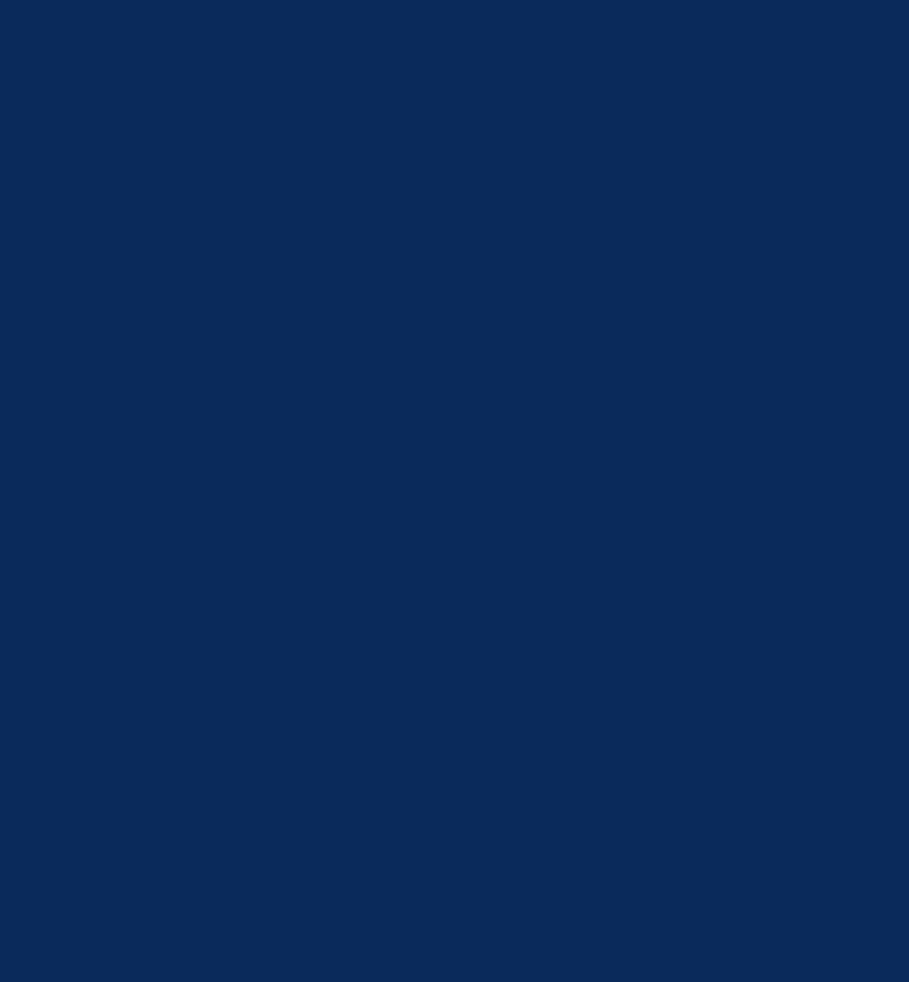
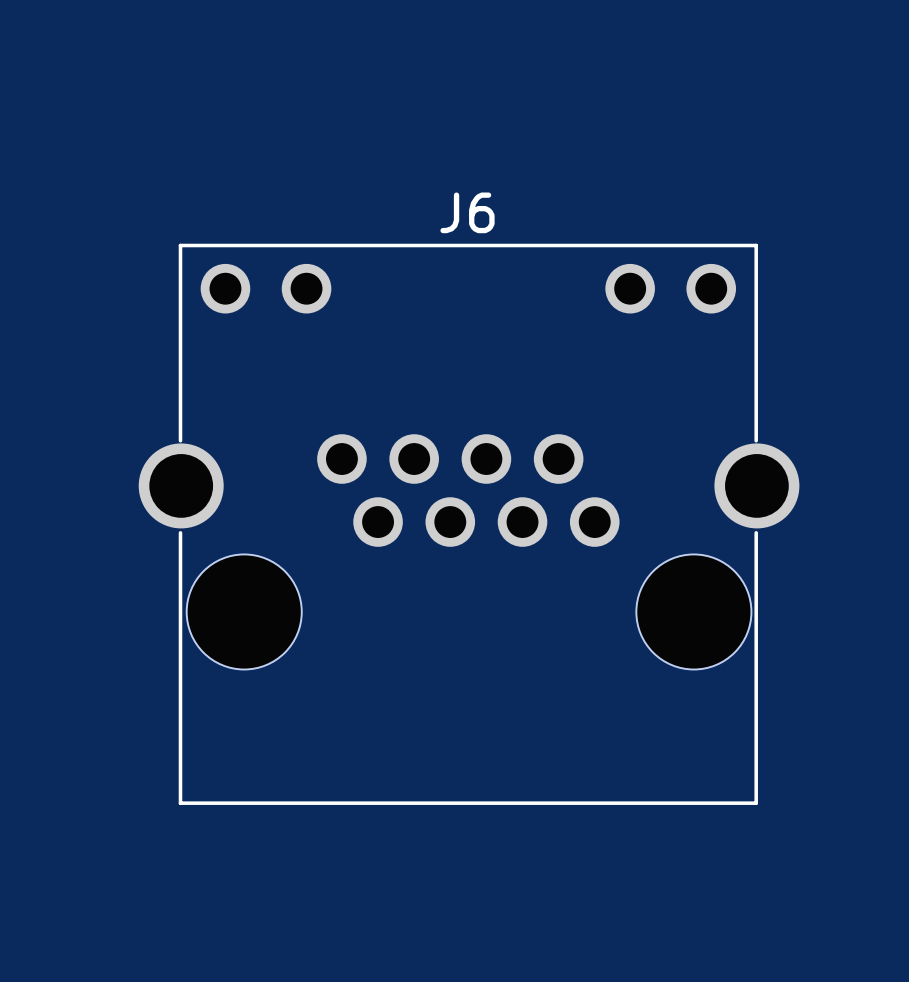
J6: none -> (469, 524)

